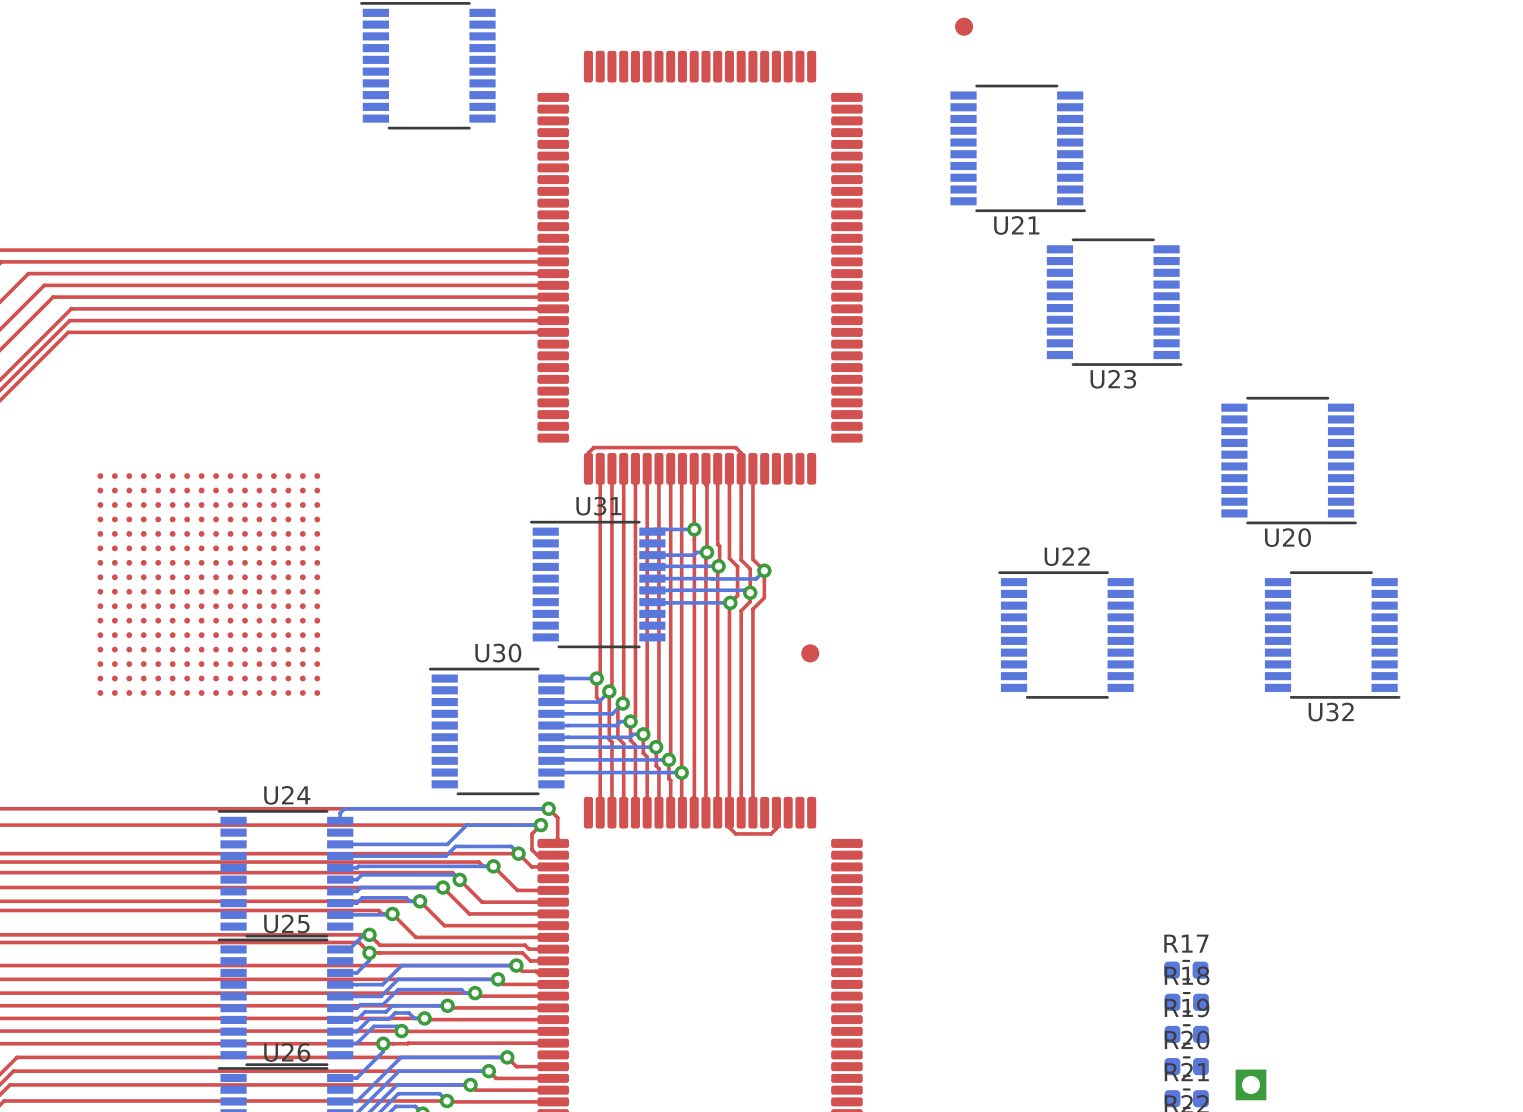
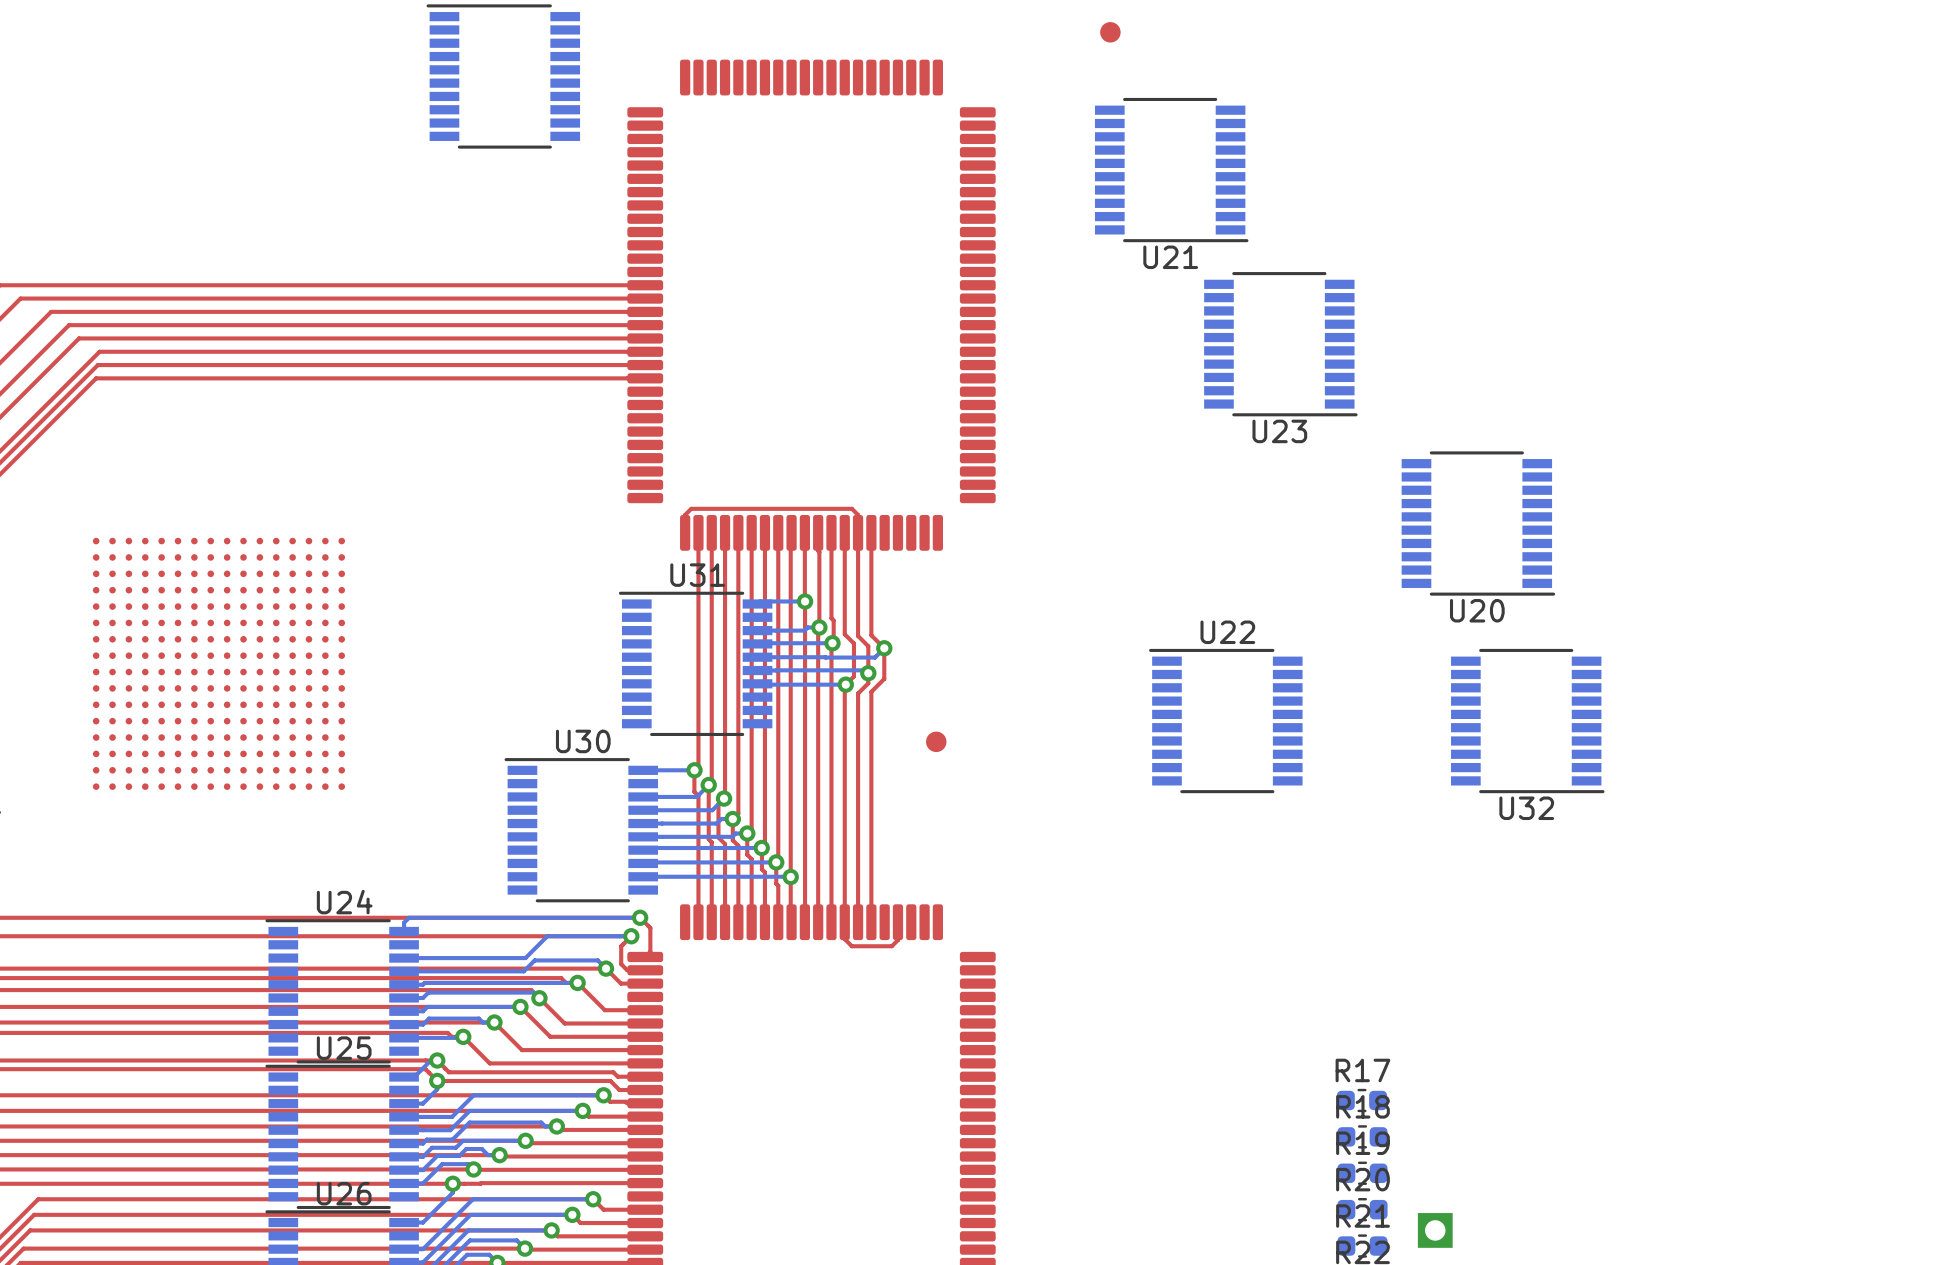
part position: (208, 584) -> (218, 663)

